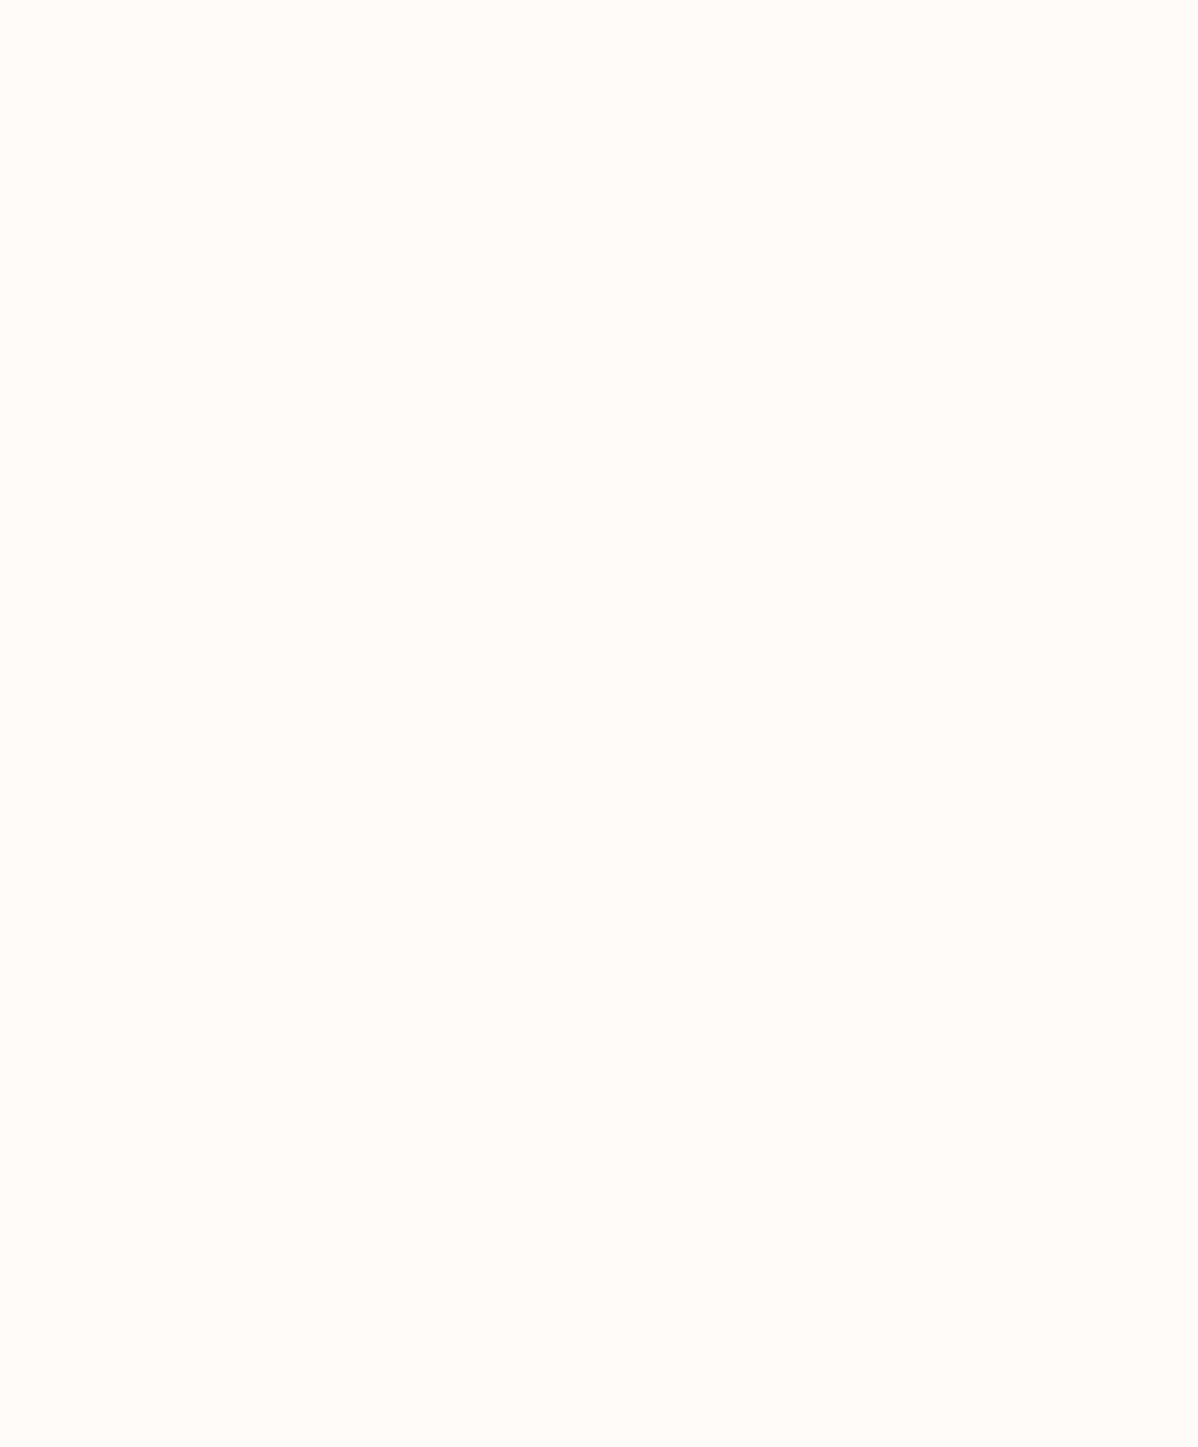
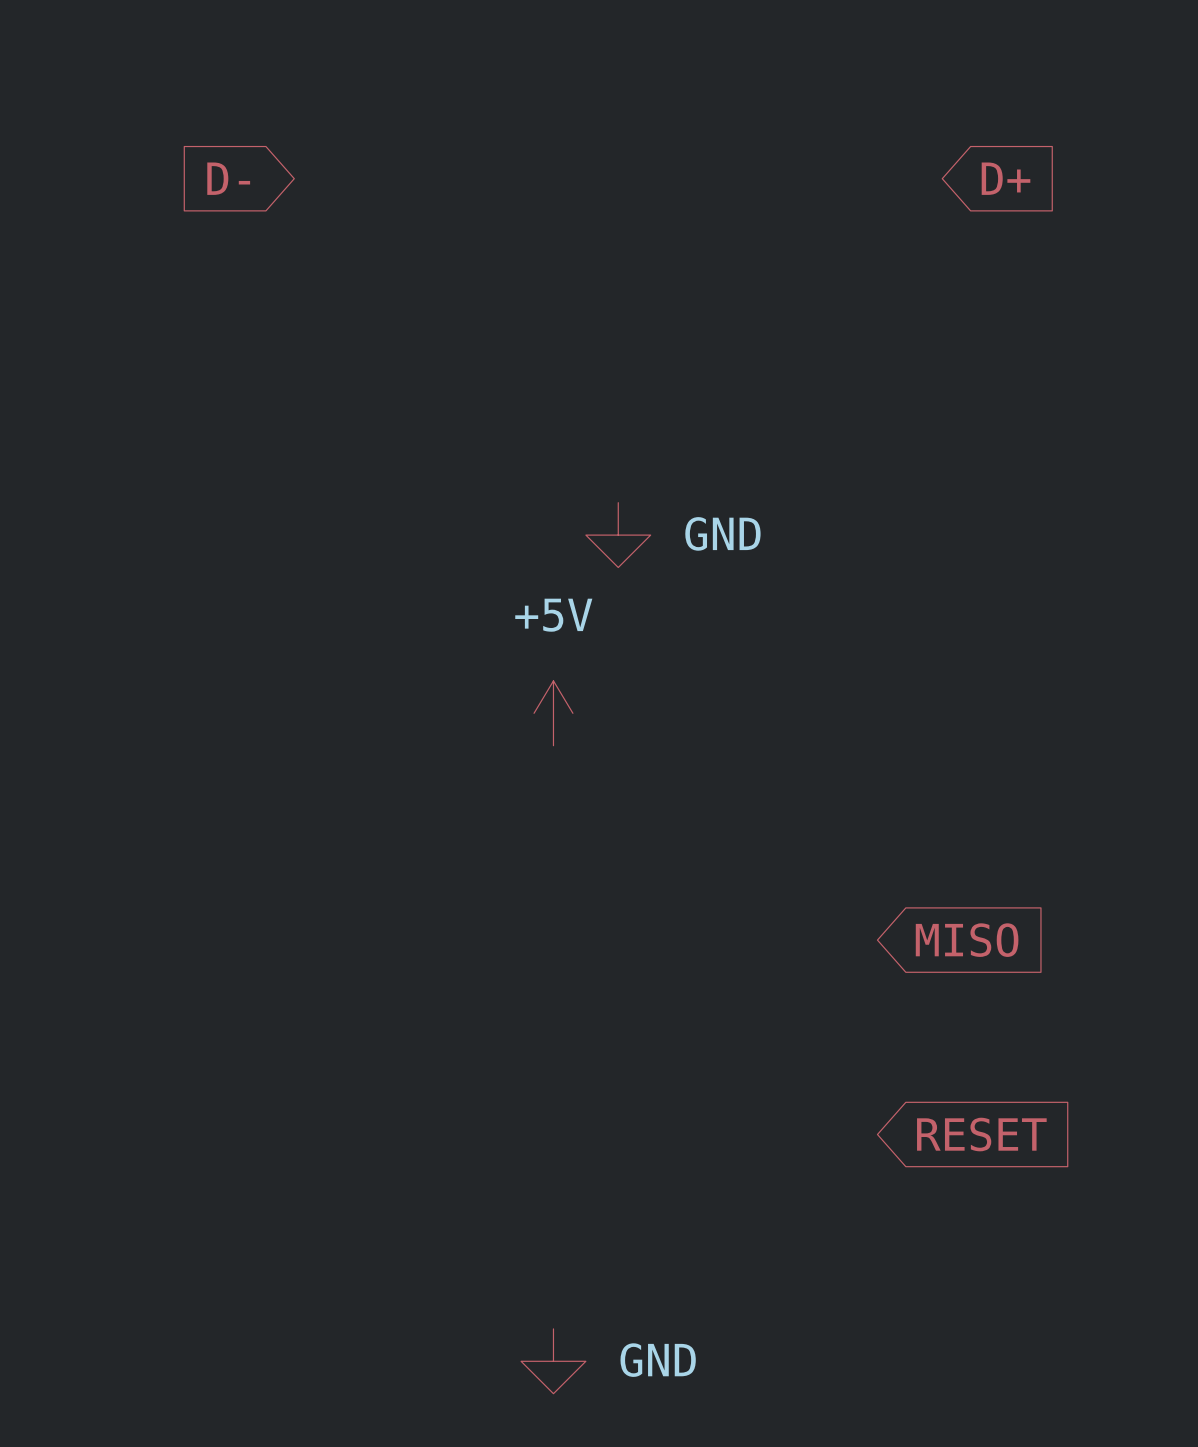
global label: none -> D- (228, 178)
global label: none -> D+ (1006, 178)
power symbol: none -> GND (618, 535)
power symbol: none -> +5V (553, 713)
global label: none -> MISO (967, 940)
global label: none -> RESET (981, 1134)
power symbol: none -> GND (553, 1361)

